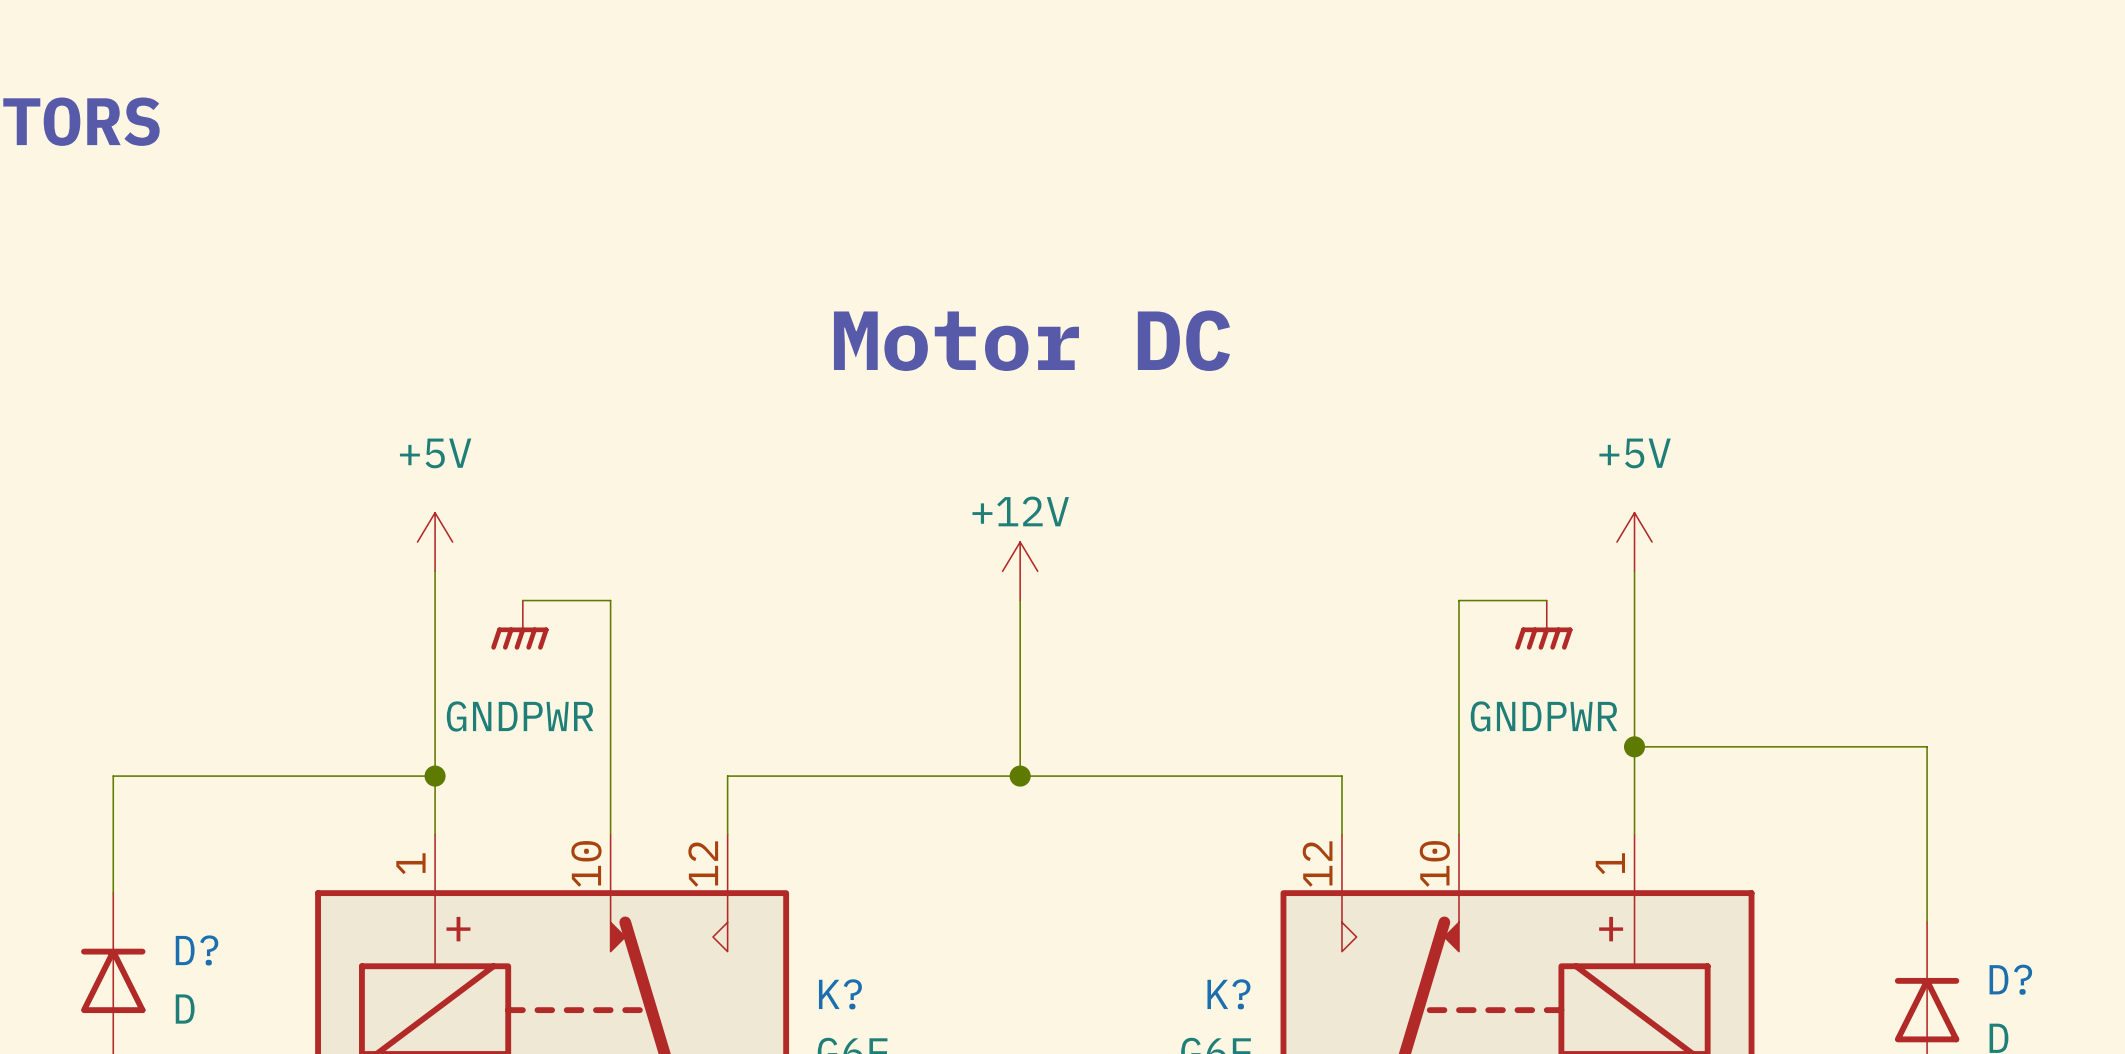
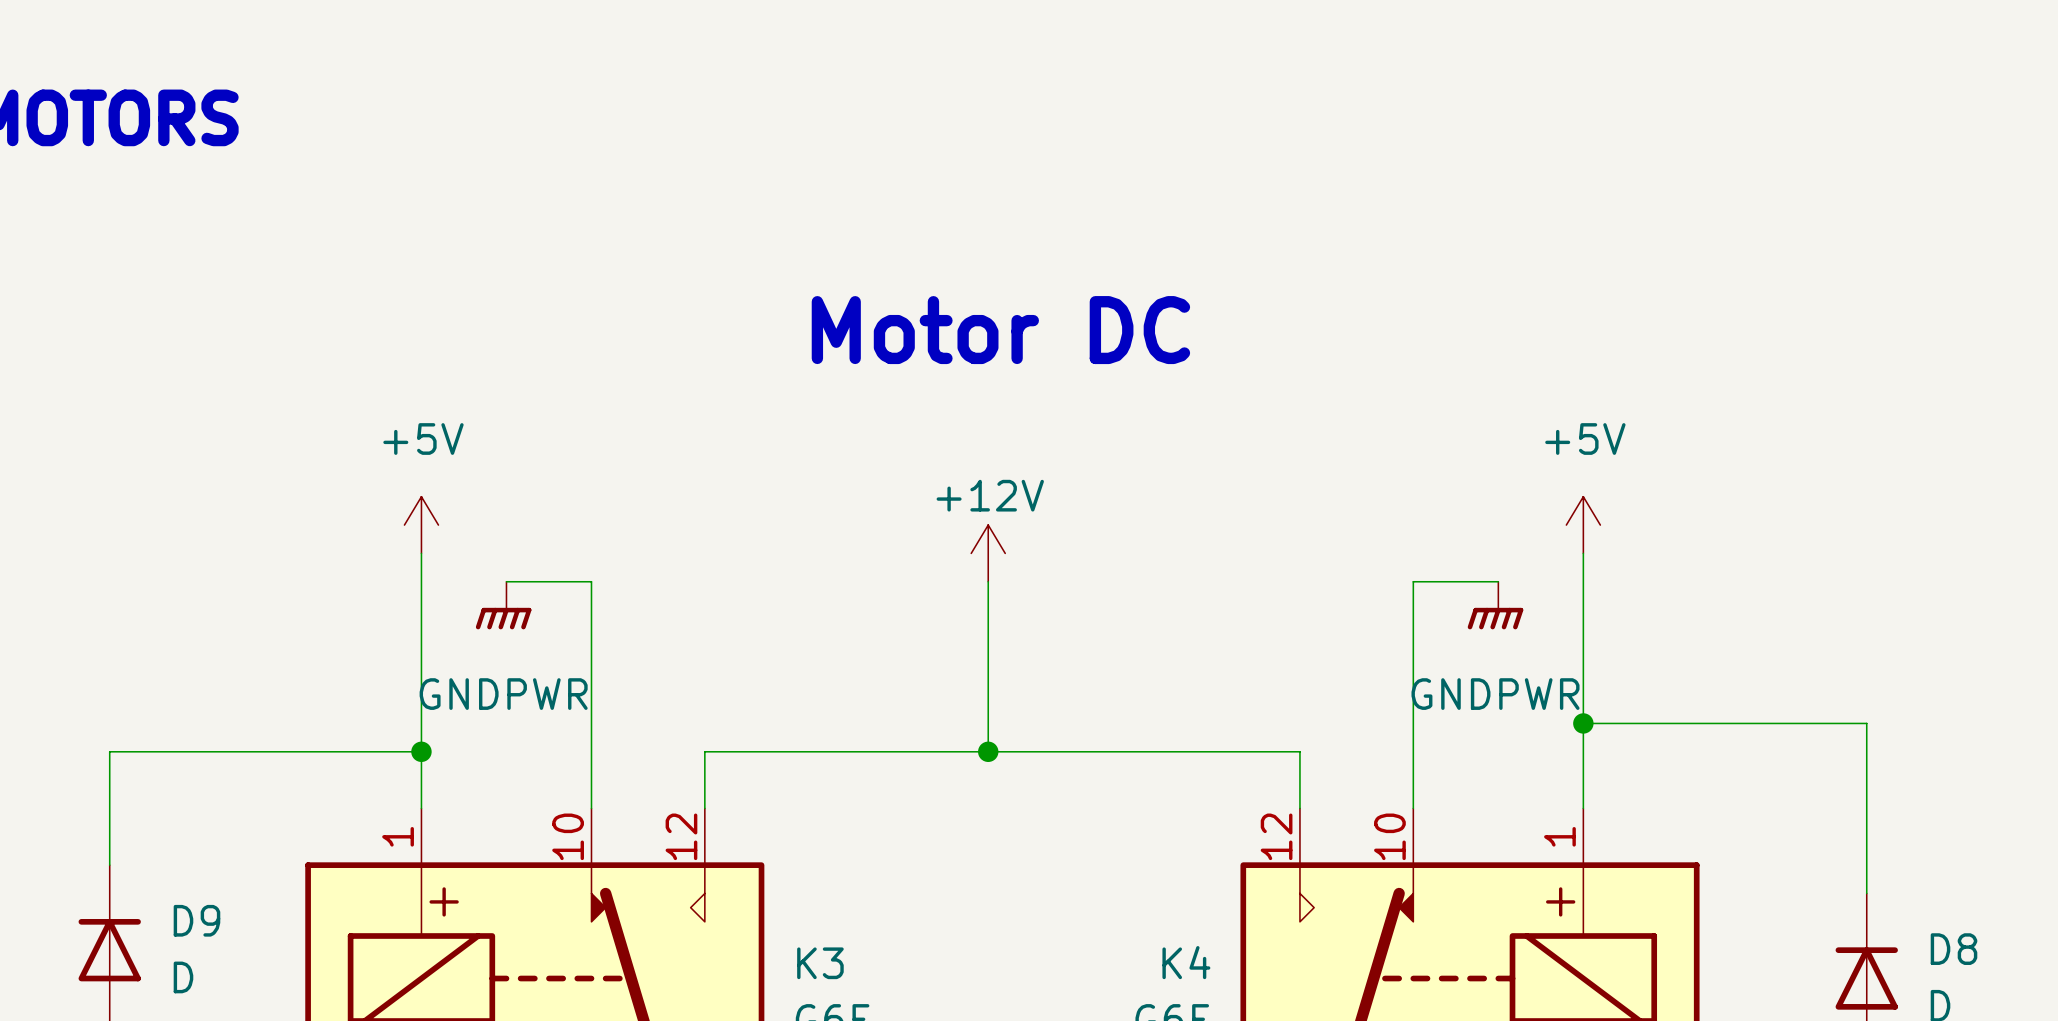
D? name: D? (197, 950) -> D9 (196, 920)
D? name: D? (2010, 979) -> D8 (1954, 949)
K? name: K? (840, 994) -> K3 (820, 963)
K? name: K? (1228, 994) -> K4 (1186, 962)

